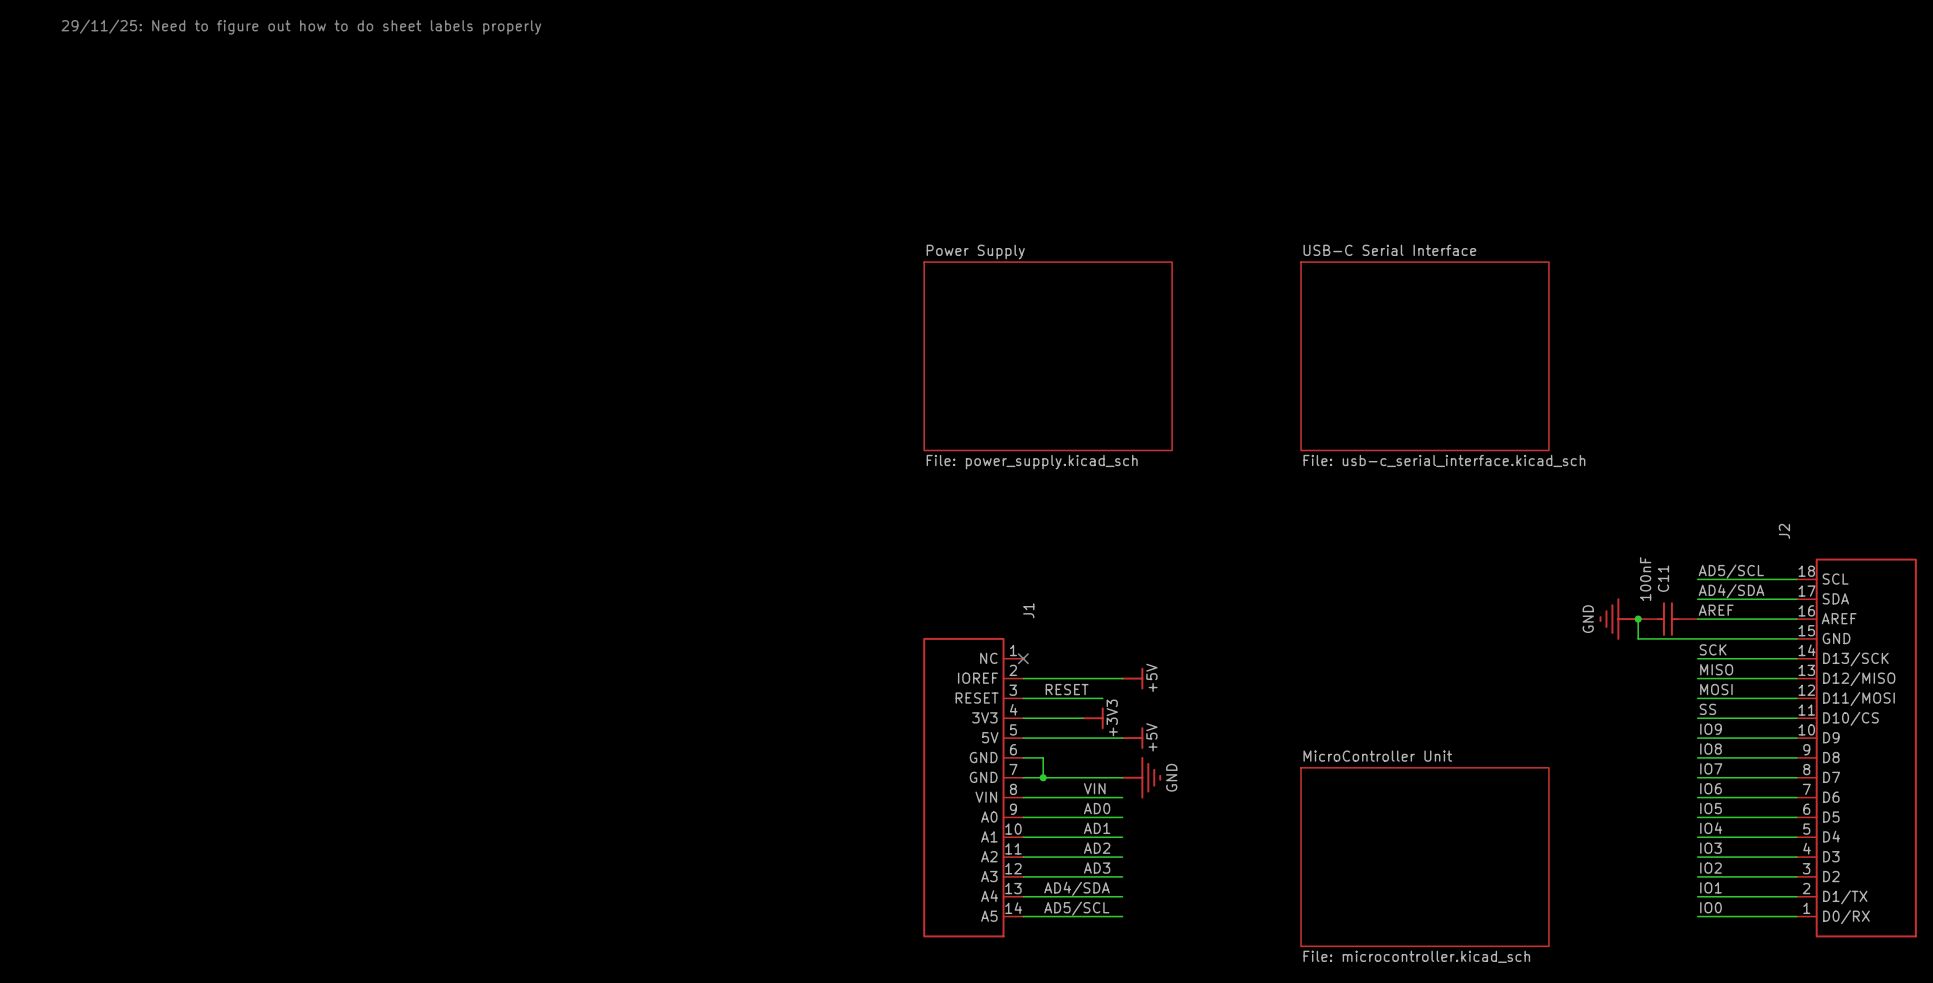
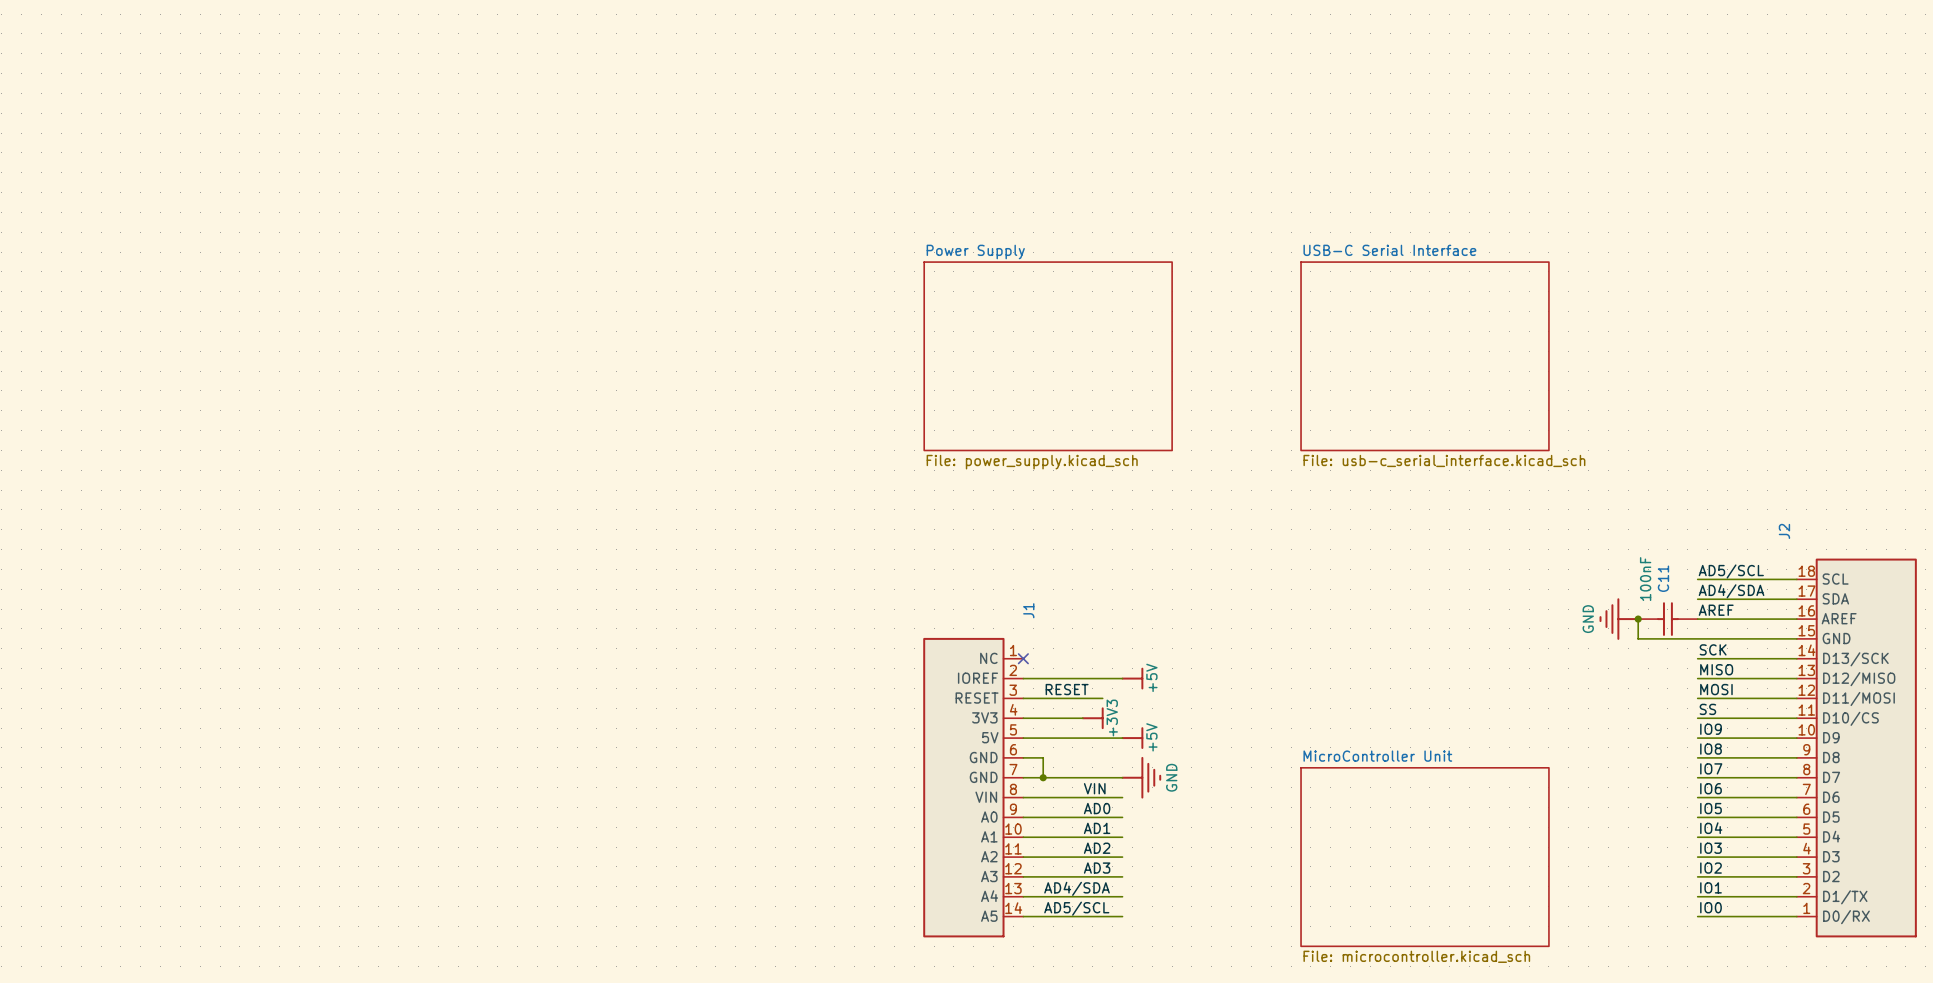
text: 29/11/25: Need to figure out how to do sheet labels properly (301, 27) -> none

